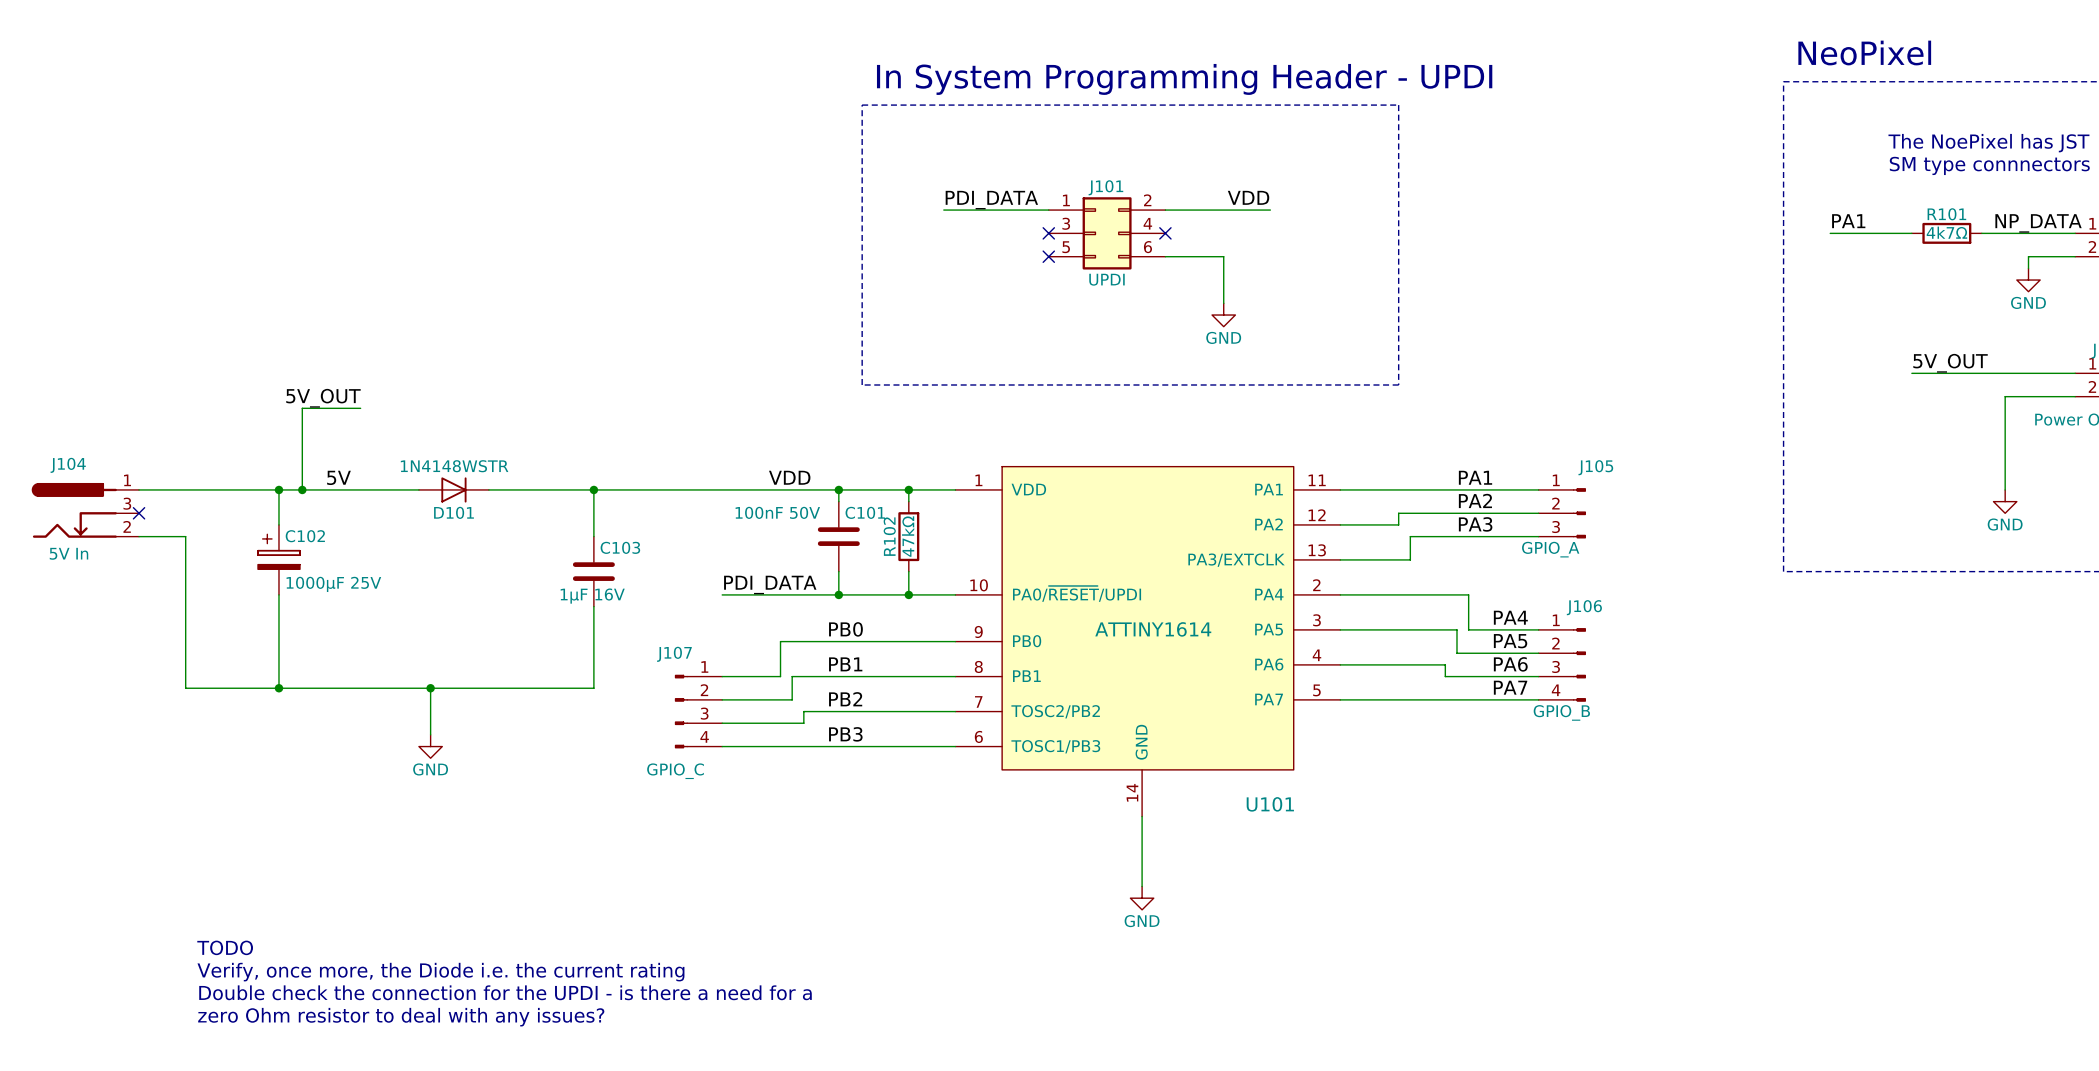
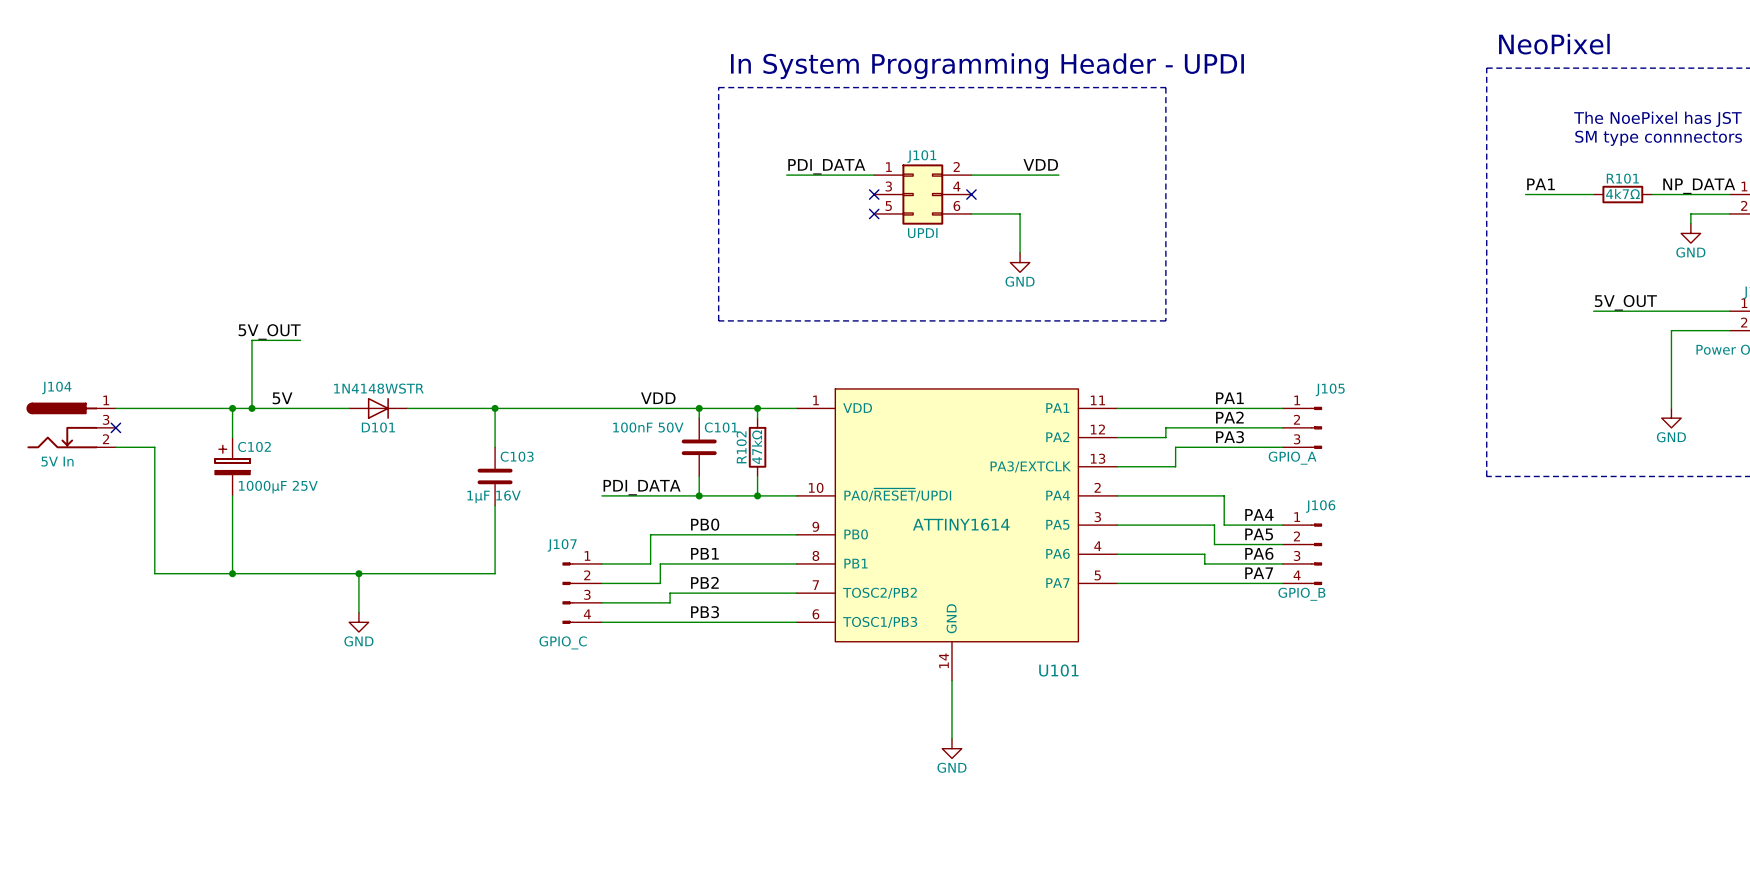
text: TODO (225, 947) -> none
text: Verify, once more, the Diode i.e. the current rating (440, 972) -> none
text: Double check the connection for the UPDI - is there a need for a (505, 992) -> none
text: zero Ohm resistor to deal with any issues? (401, 1017) -> none

